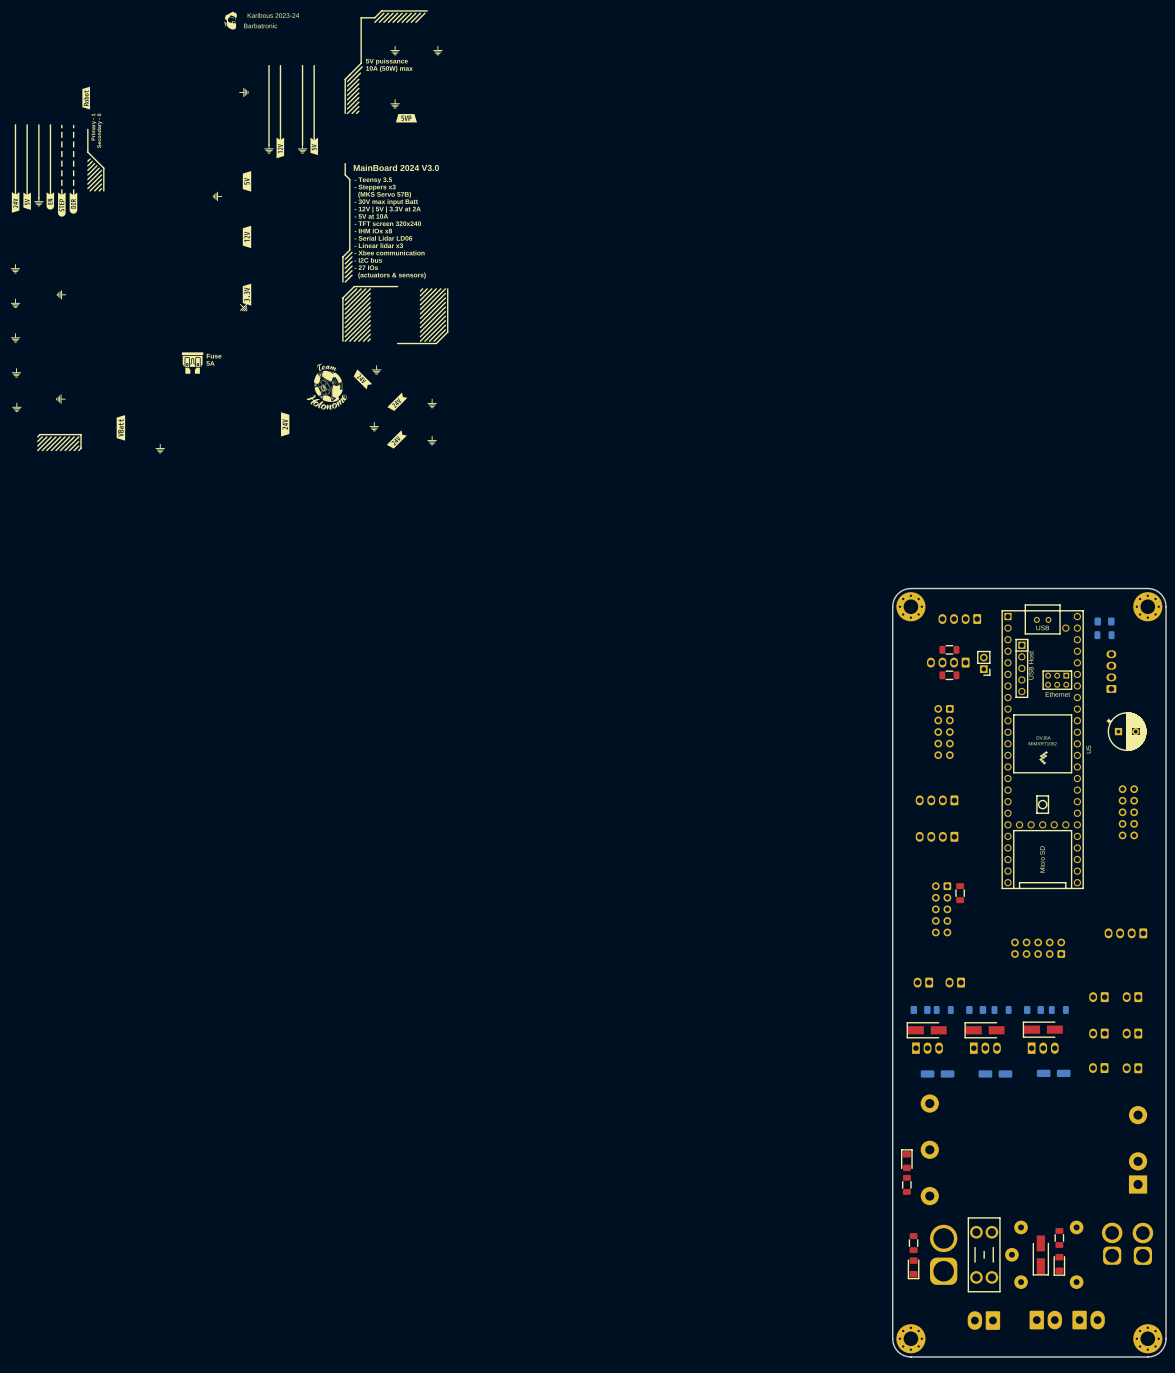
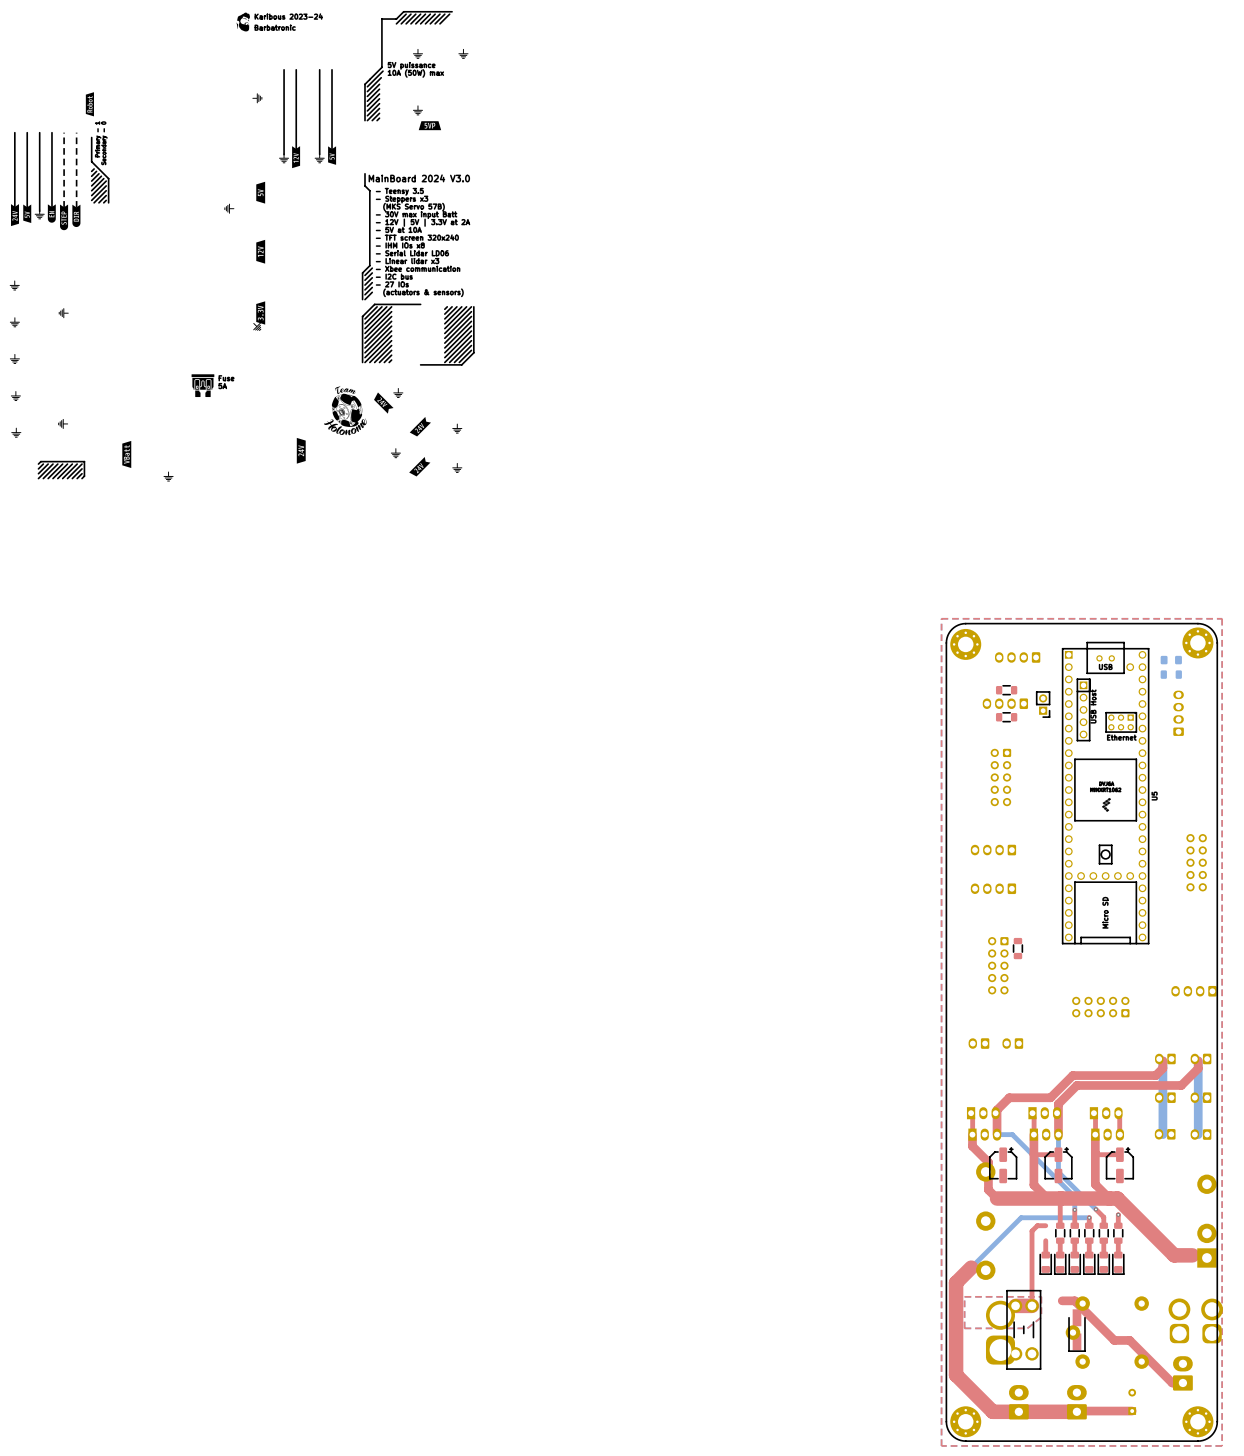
top zone outline: none -> (941, 618) (1222, 618) (1222, 1445) (941, 1445) (941, 618)
board edge: (892, 606) (898, 593) (910, 588) (1147, 588) (1158, 592) (1165, 602) (1166, 1338) (1163, 1347) (1156, 1354) (1150, 1356) (1129, 1356) -> (946, 644) (947, 635) (952, 629) (965, 623) (1197, 623) (1209, 627) (1216, 637) (1217, 1421) (1211, 1435) (1197, 1441)
part position: (1147, 606) -> (1197, 642)
part: (1126, 731) -> none
top track: none -> (1162, 1060) (1162, 1068) (1155, 1075) (1072, 1075) (1050, 1097) (1009, 1097) (997, 1110) (997, 1134) (996, 1117)
bottom track: none -> (1162, 1060) (1162, 1134)
top track: none -> (1198, 1060) (1198, 1068) (1181, 1085) (1076, 1085) (1058, 1103) (1058, 1134) (1058, 1117)
bottom track: none -> (1198, 1060) (1198, 1134)
part: (920, 1009) -> none
part: (943, 1009) -> none
part: (976, 1009) -> none
part: (1001, 1009) -> none
part: (1033, 1009) -> none
part: (1058, 1009) -> none
part: (1042, 1029) -> none
part: (926, 1030) -> none
part: (984, 1030) -> none
top track: none -> (1095, 1117) (1095, 1184) (1109, 1198)
top track: none -> (1119, 1117) (1119, 1134)
top track: none -> (972, 1117) (972, 1146) (988, 1162) (988, 1189) (997, 1198) (1117, 1198) (1174, 1255) (1192, 1255)
top track: none -> (1034, 1117) (1033, 1185) (1047, 1198)
part: none -> (984, 1134)
bottom track: none -> (997, 1134) (1012, 1134) (1074, 1196) (1074, 1209)
part: none -> (1046, 1134)
bottom track: none -> (1058, 1134) (1058, 1172) (1095, 1209)
part: none -> (1107, 1134)
part side: bottom (937, 1073) -> top (1058, 1165)
part side: bottom (995, 1073) -> top (1003, 1165)
part side: bottom (1053, 1073) -> top (1119, 1165)
top track: none -> (1095, 1153) (1096, 1154) (1119, 1154)
top track: none -> (1033, 1154) (1058, 1154)
top track: none -> (1060, 1198) (1060, 1225)
top track: none -> (1095, 1209) (1103, 1217) (1103, 1225)
via: none -> (1095, 1209)
top track: none -> (1074, 1209) (1074, 1225)
via: none -> (1074, 1209)
top track: none -> (1118, 1214) (1118, 1225)
via: none -> (1118, 1214)
top track: none -> (1089, 1217) (1089, 1225)
bottom track: none -> (1089, 1217) (1021, 1217) (971, 1267)
via: none -> (1089, 1217)
top track: none -> (1045, 1225) (1037, 1225) (1032, 1231) (1032, 1305) (1015, 1305)
part: (906, 1160) -> none
part: none -> (1060, 1233)
part: none -> (1074, 1233)
part: none -> (1089, 1233)
part: none -> (1103, 1233)
part: none -> (1118, 1233)
top track: none -> (1045, 1240) (1045, 1255)
top track: none -> (1060, 1240) (1060, 1255)
top track: none -> (1074, 1240) (1074, 1255)
top track: none -> (1089, 1240) (1089, 1255)
top track: none -> (1103, 1240) (1103, 1255)
top track: none -> (1118, 1240) (1118, 1255)
part: (906, 1184) -> none
part: none -> (1045, 1263)
part: none -> (1060, 1263)
part: none -> (1074, 1263)
part: none -> (1089, 1263)
part: none -> (1103, 1263)
part: none -> (1118, 1263)
top track: none -> (971, 1267) (956, 1282) (956, 1375) (992, 1411) (1132, 1411)
top zone outline: none -> (964, 1296) (964, 1328) (1027, 1328) (1041, 1317) (1041, 1296) (964, 1296)
top track: none -> (1062, 1300) (1074, 1300) (1114, 1340) (1129, 1340) (1172, 1382) (1182, 1382)
part: (1059, 1237) -> none
part: (913, 1243) -> none
part position: (984, 1254) -> (1023, 1329)
part position: (1040, 1255) -> (1077, 1330)
part: (1059, 1264) -> none
part: (913, 1268) -> none
part: none -> (1182, 1373)
part: none -> (1132, 1401)
part: none -> (1018, 1402)
part: (983, 1320) -> none
part: none -> (1076, 1402)
part: (1045, 1320) -> none
part: (1088, 1320) -> none
part position: (1147, 1338) -> (1197, 1421)

